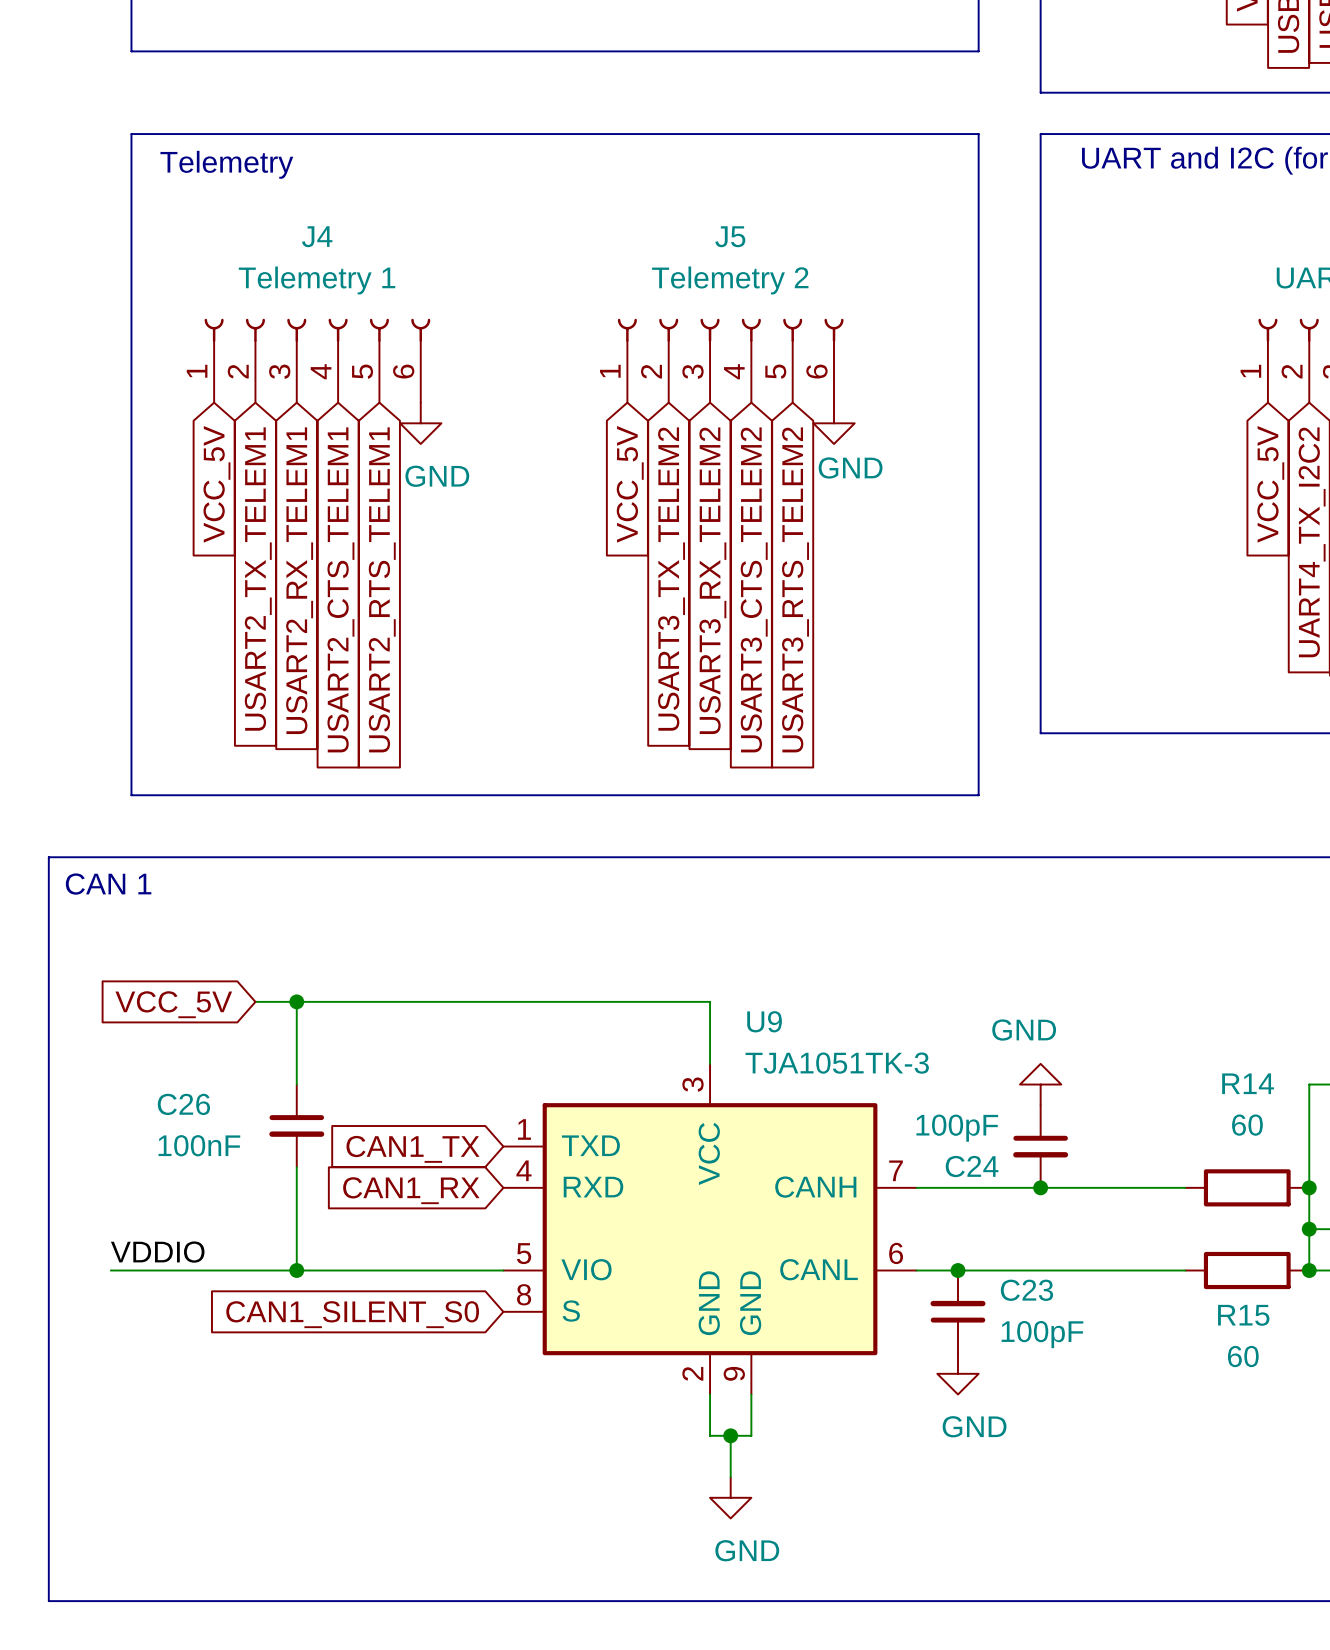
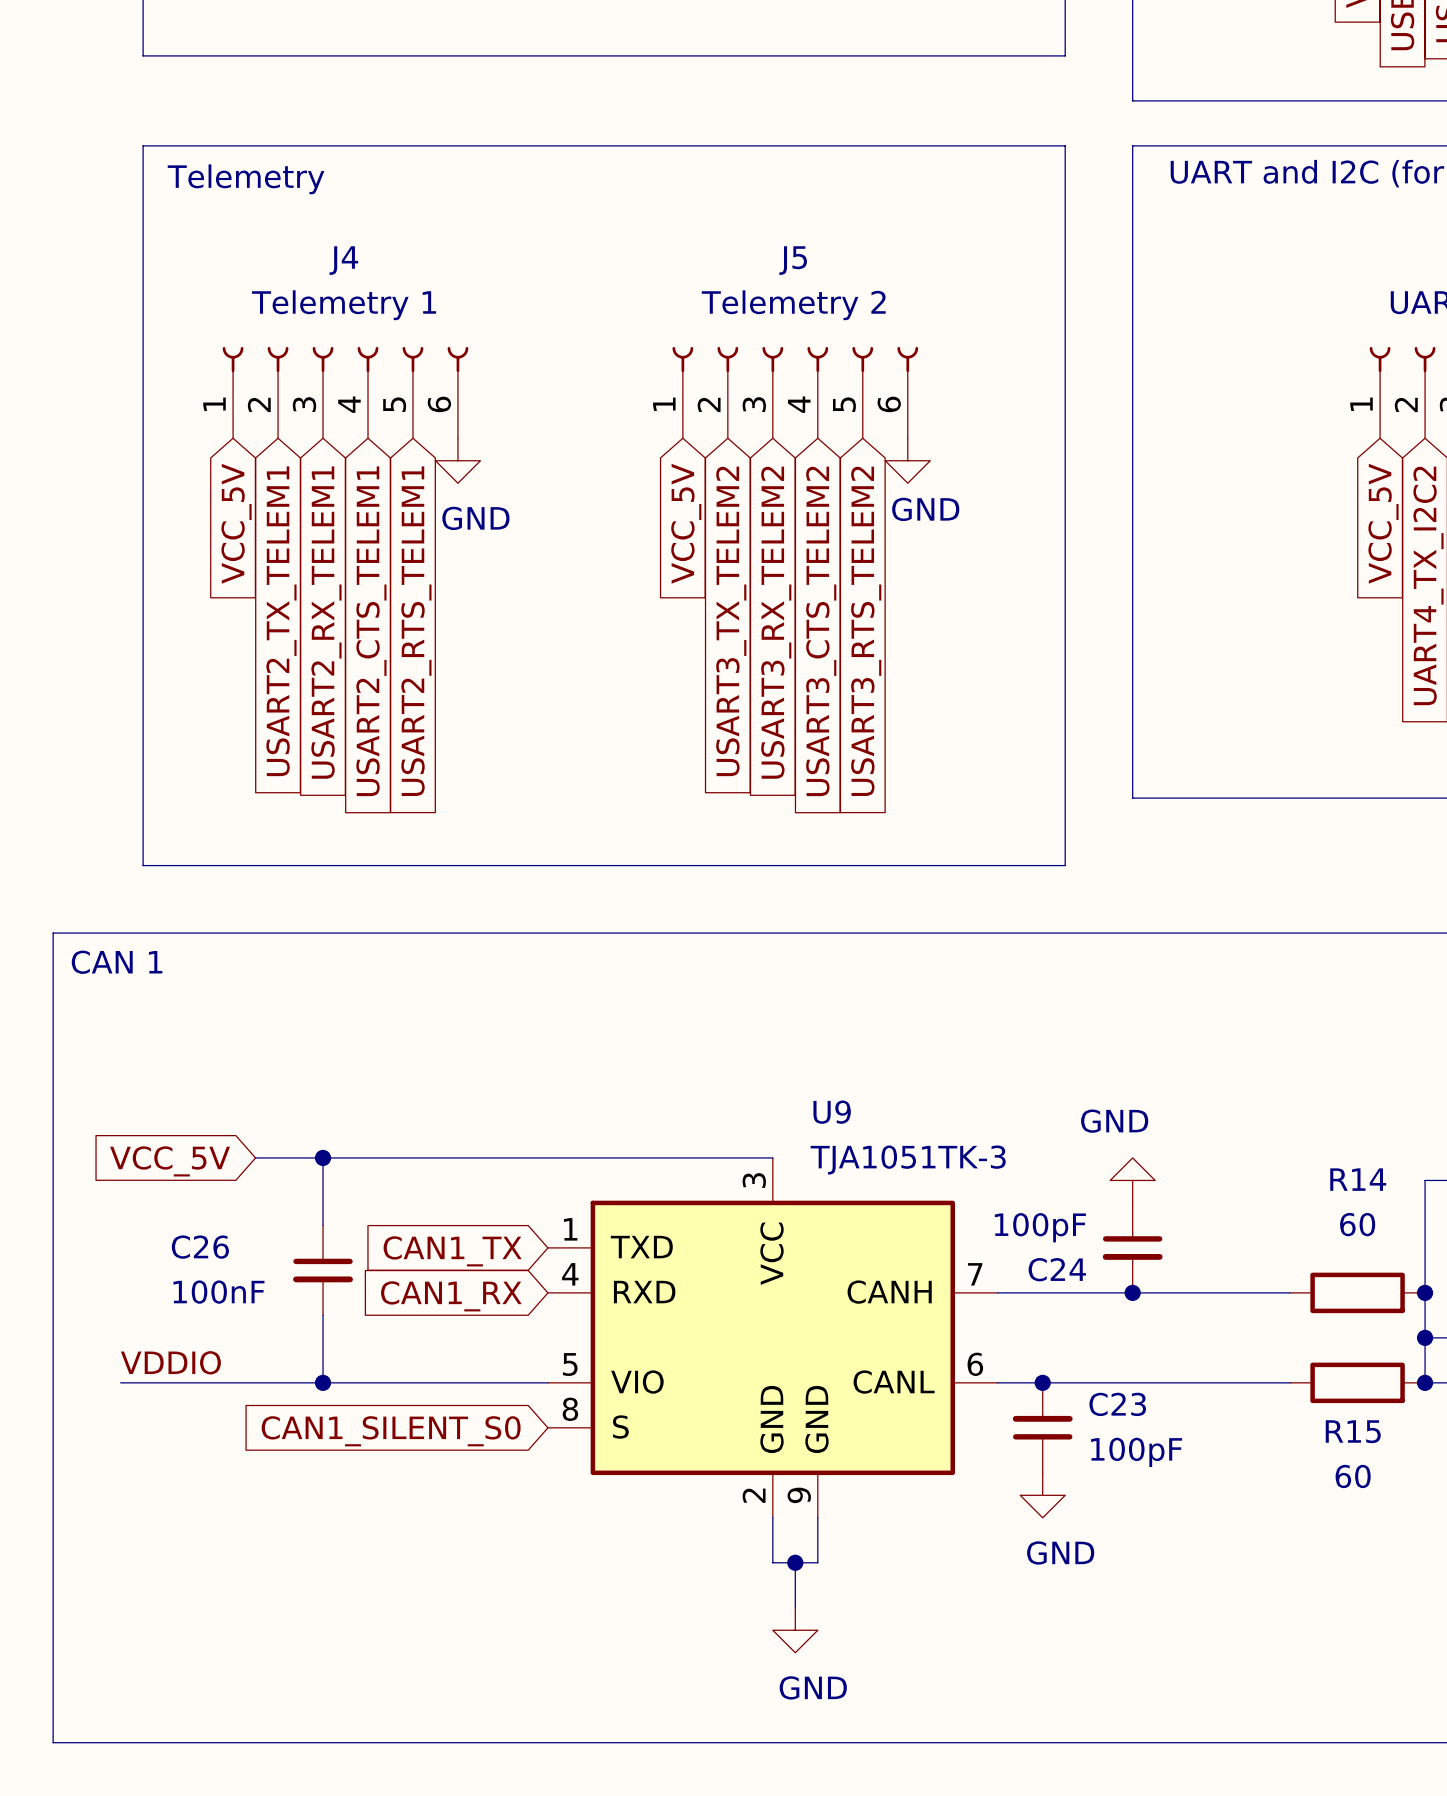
wire: (255, 1001) (710, 1001) (710, 1063) -> (255, 1157) (772, 1157)
wire: (296, 1001) (296, 1063) -> none
junction position: (296, 1001) -> (323, 1157)
global label position: VCC_5V (173, 1004) -> VCC_5V (170, 1161)
C26 position: (296, 1125) -> (323, 1270)

